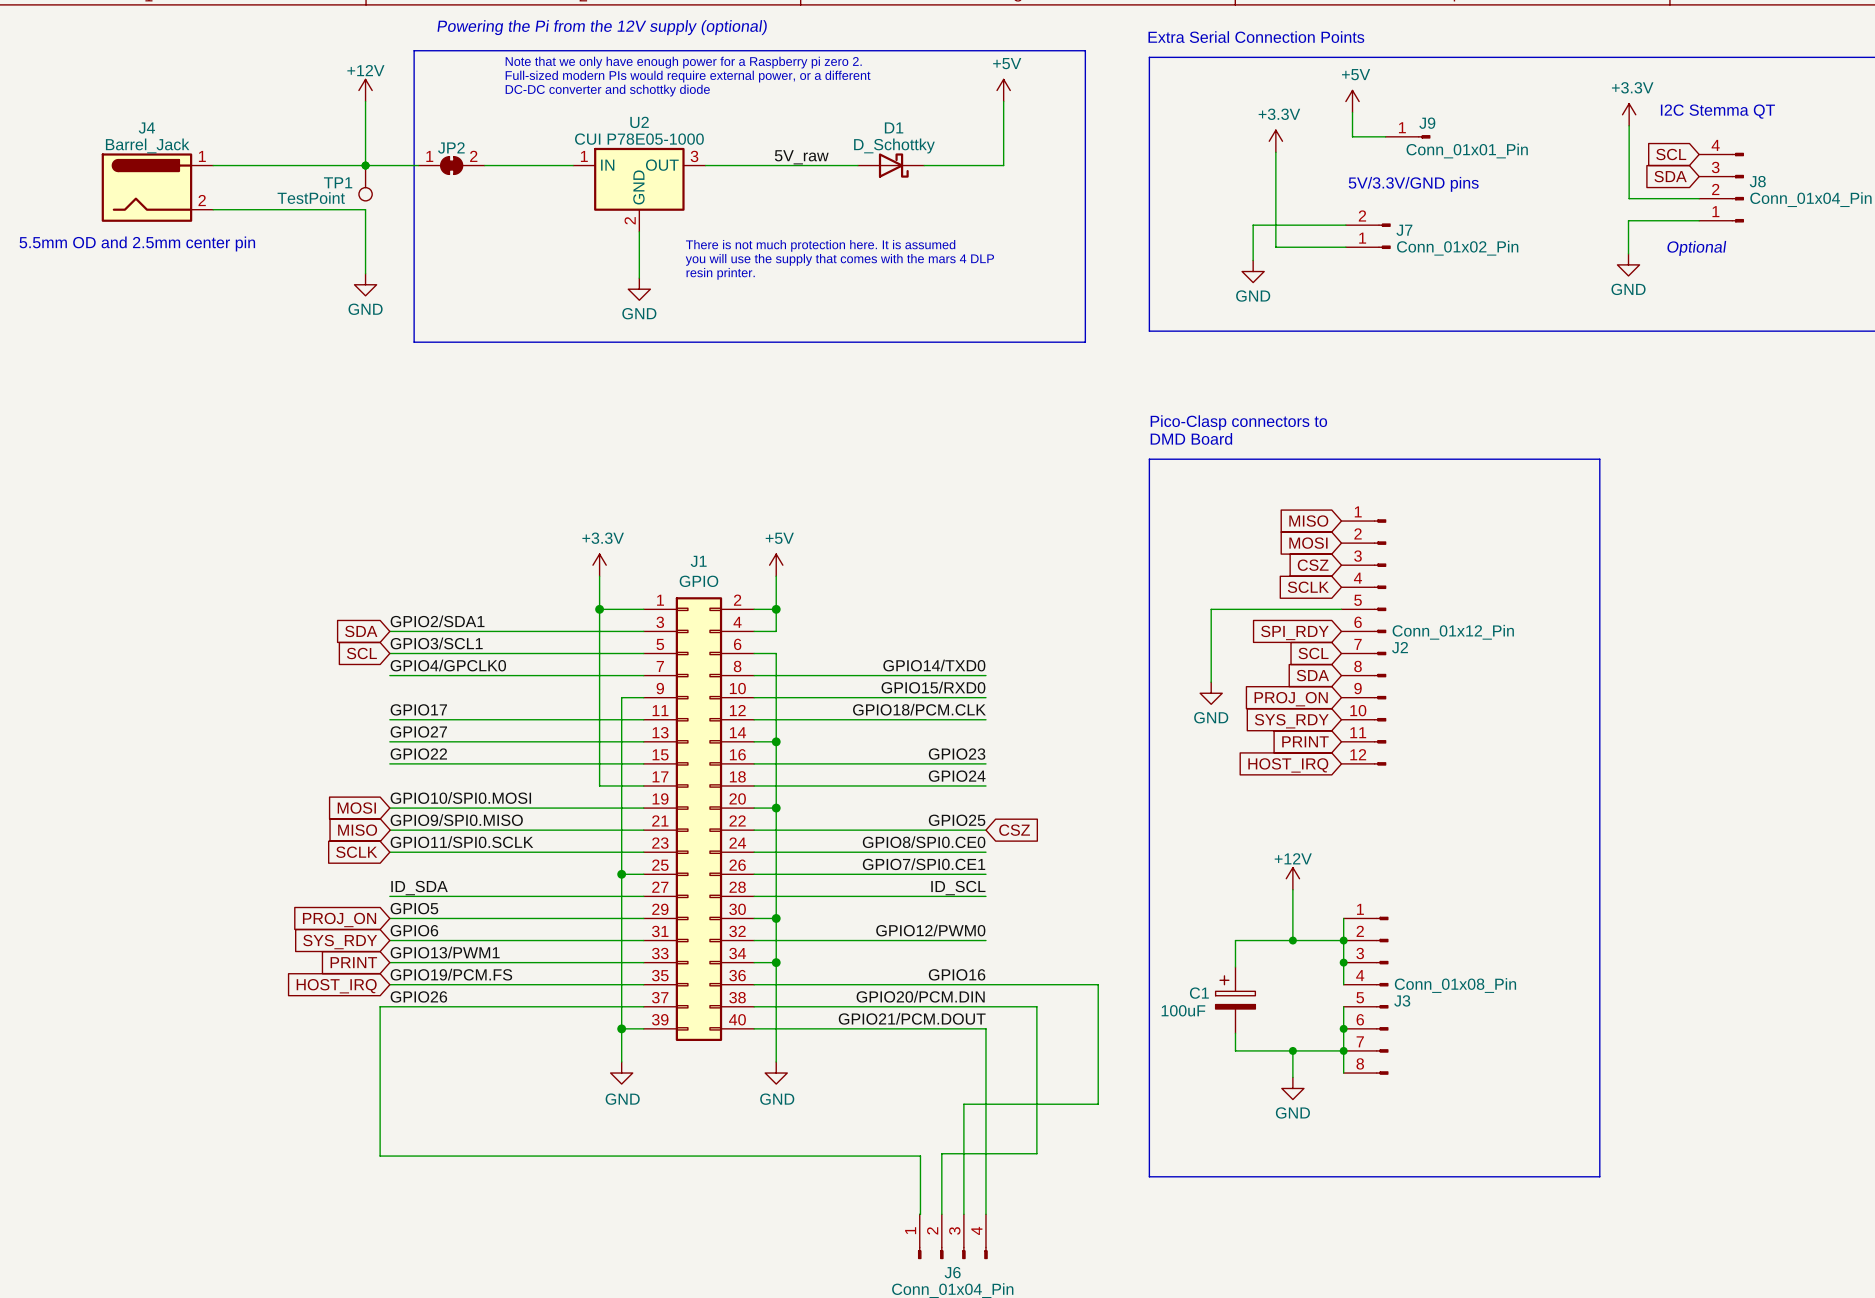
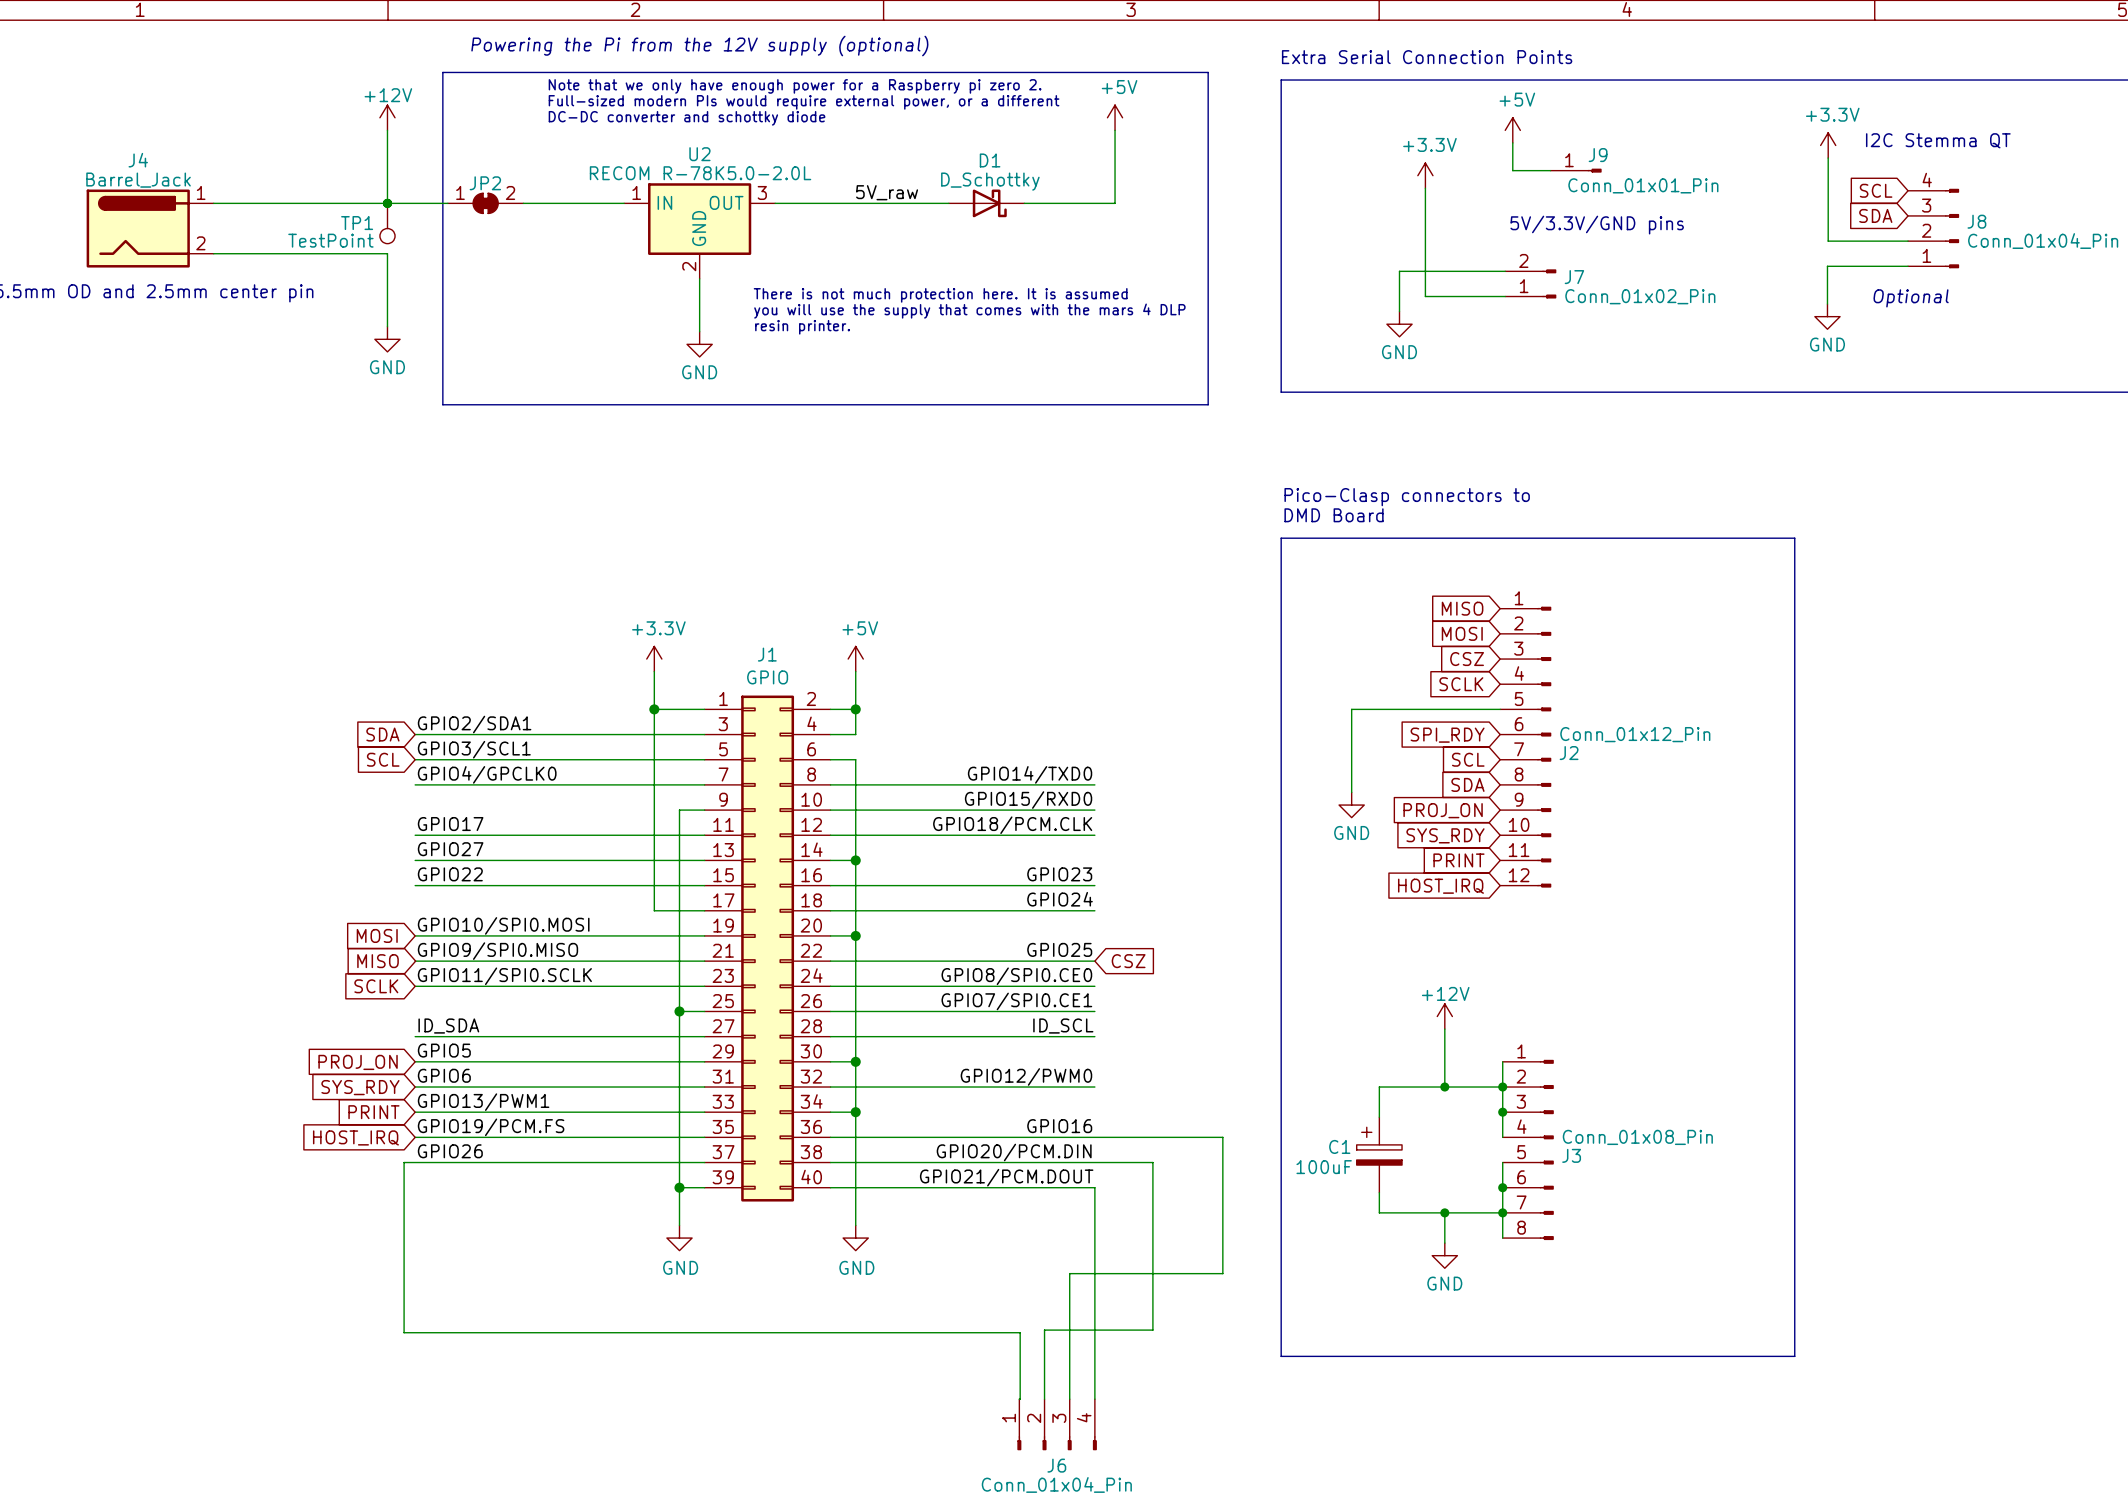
U2 value: CUI P78E05-1000 (639, 139) -> RECOM R-78K5.0-2.0L (700, 173)

